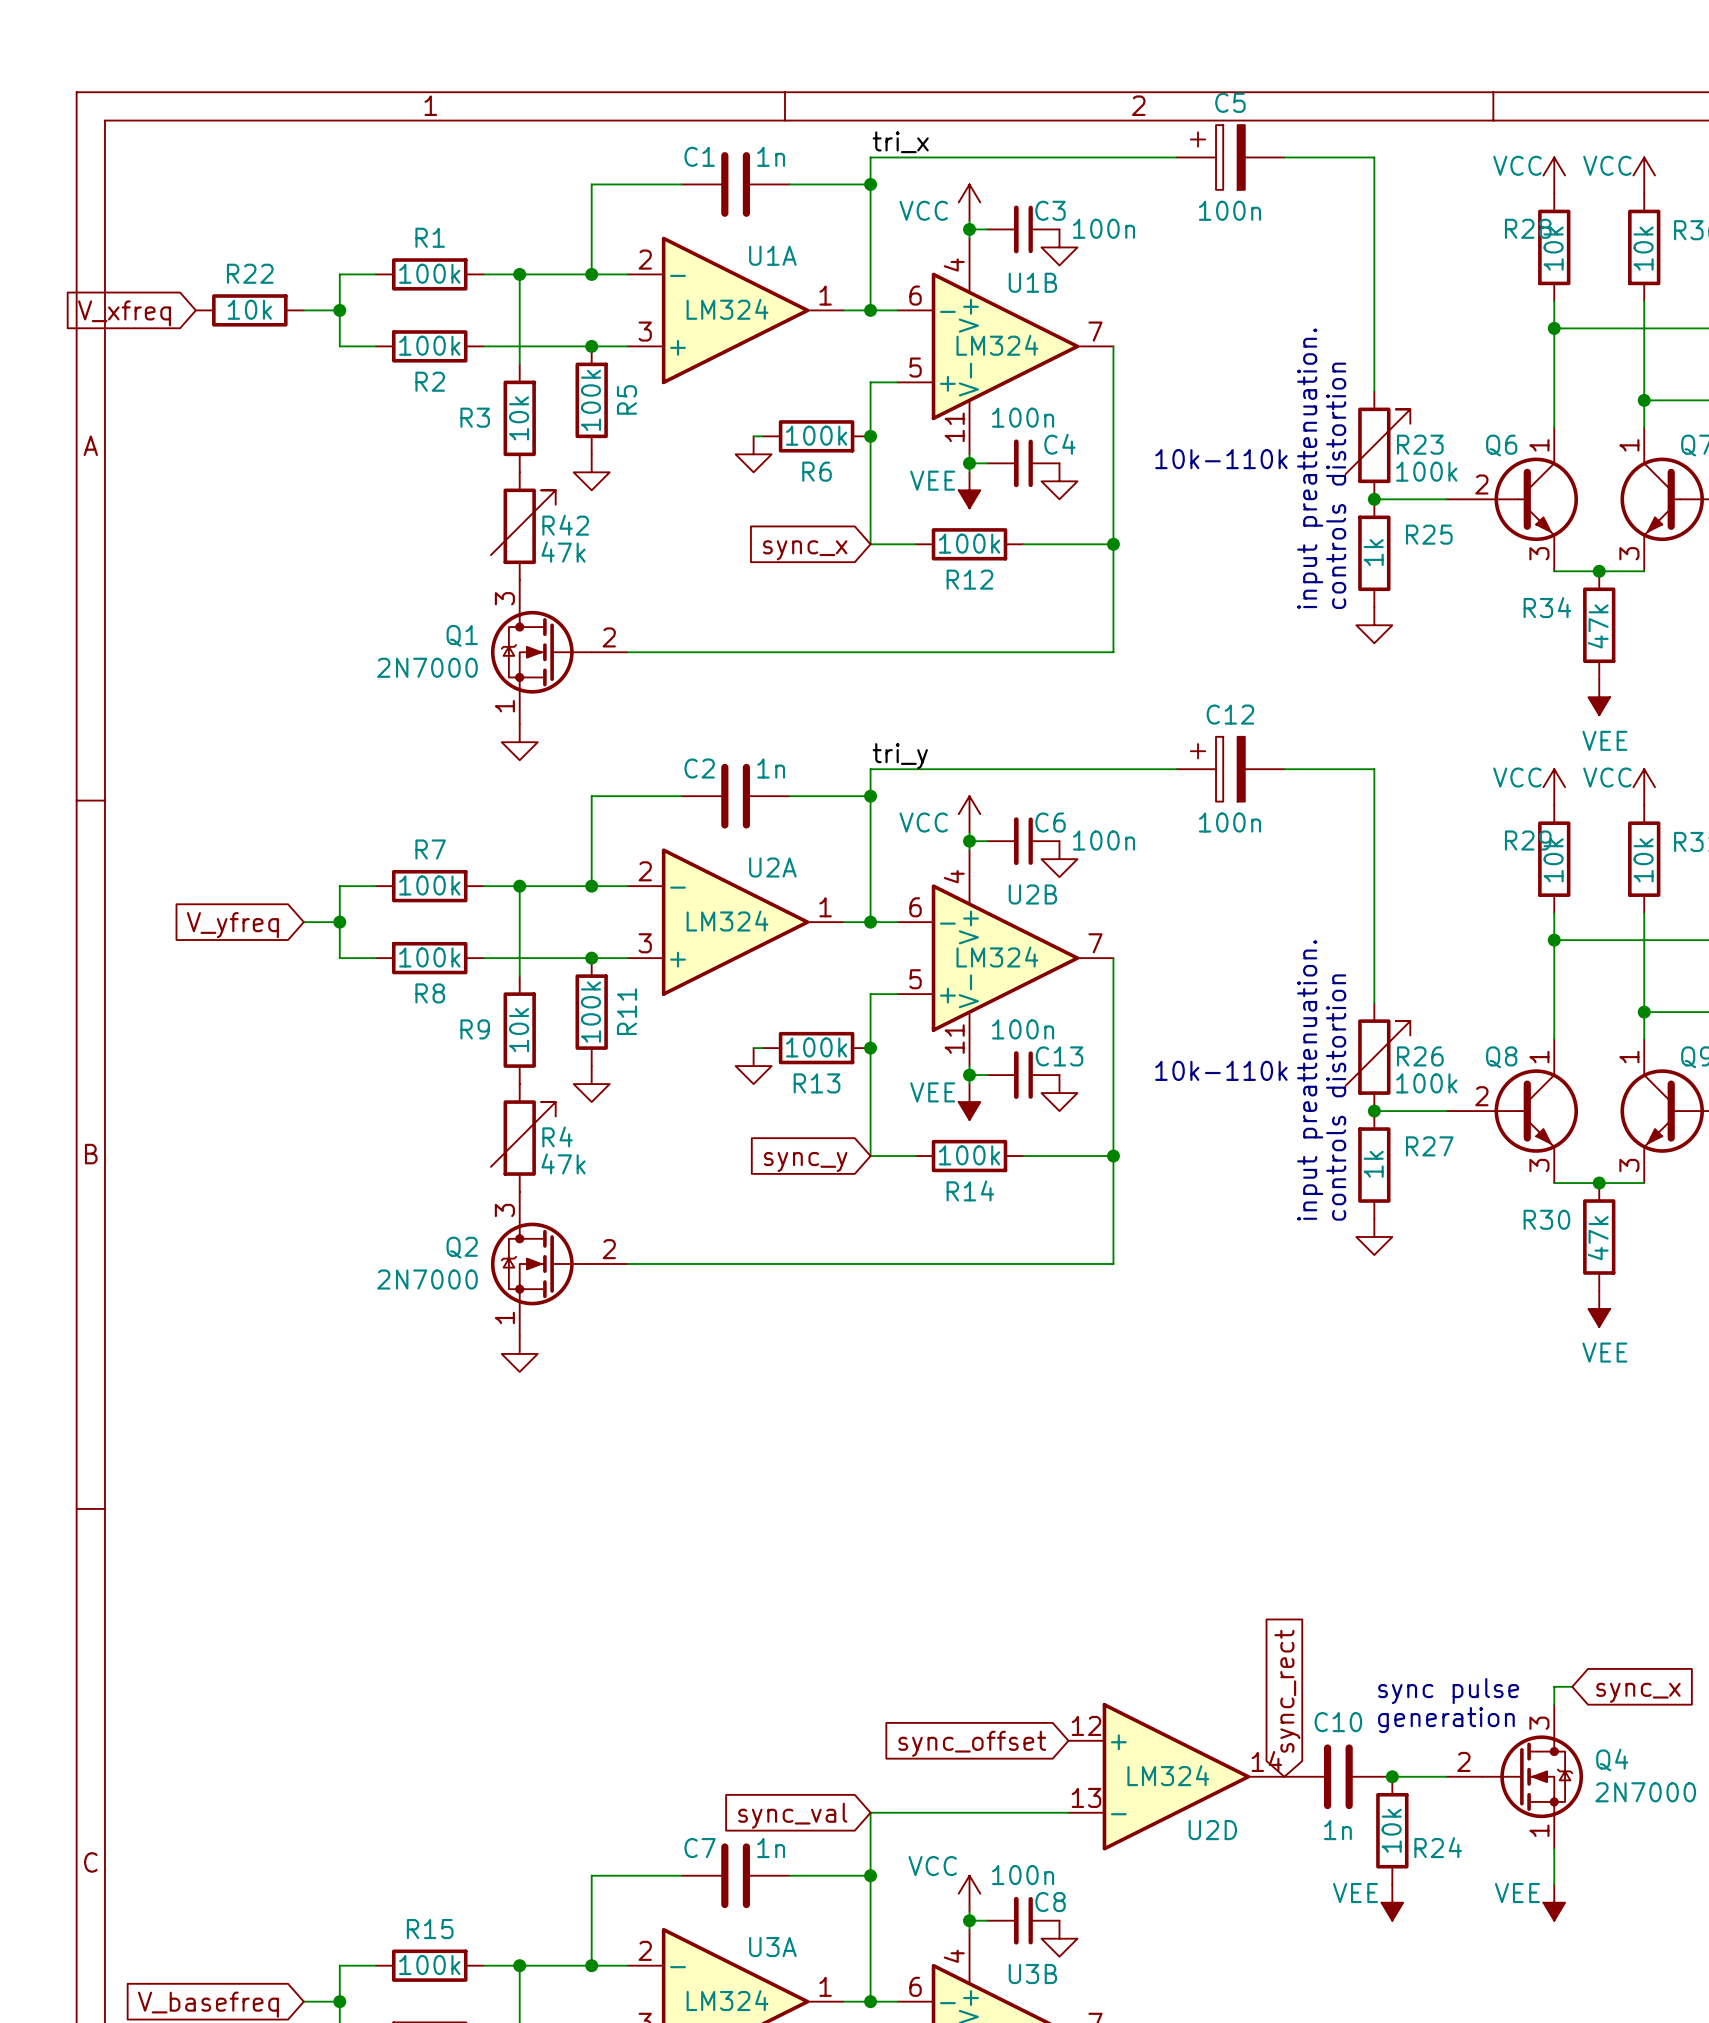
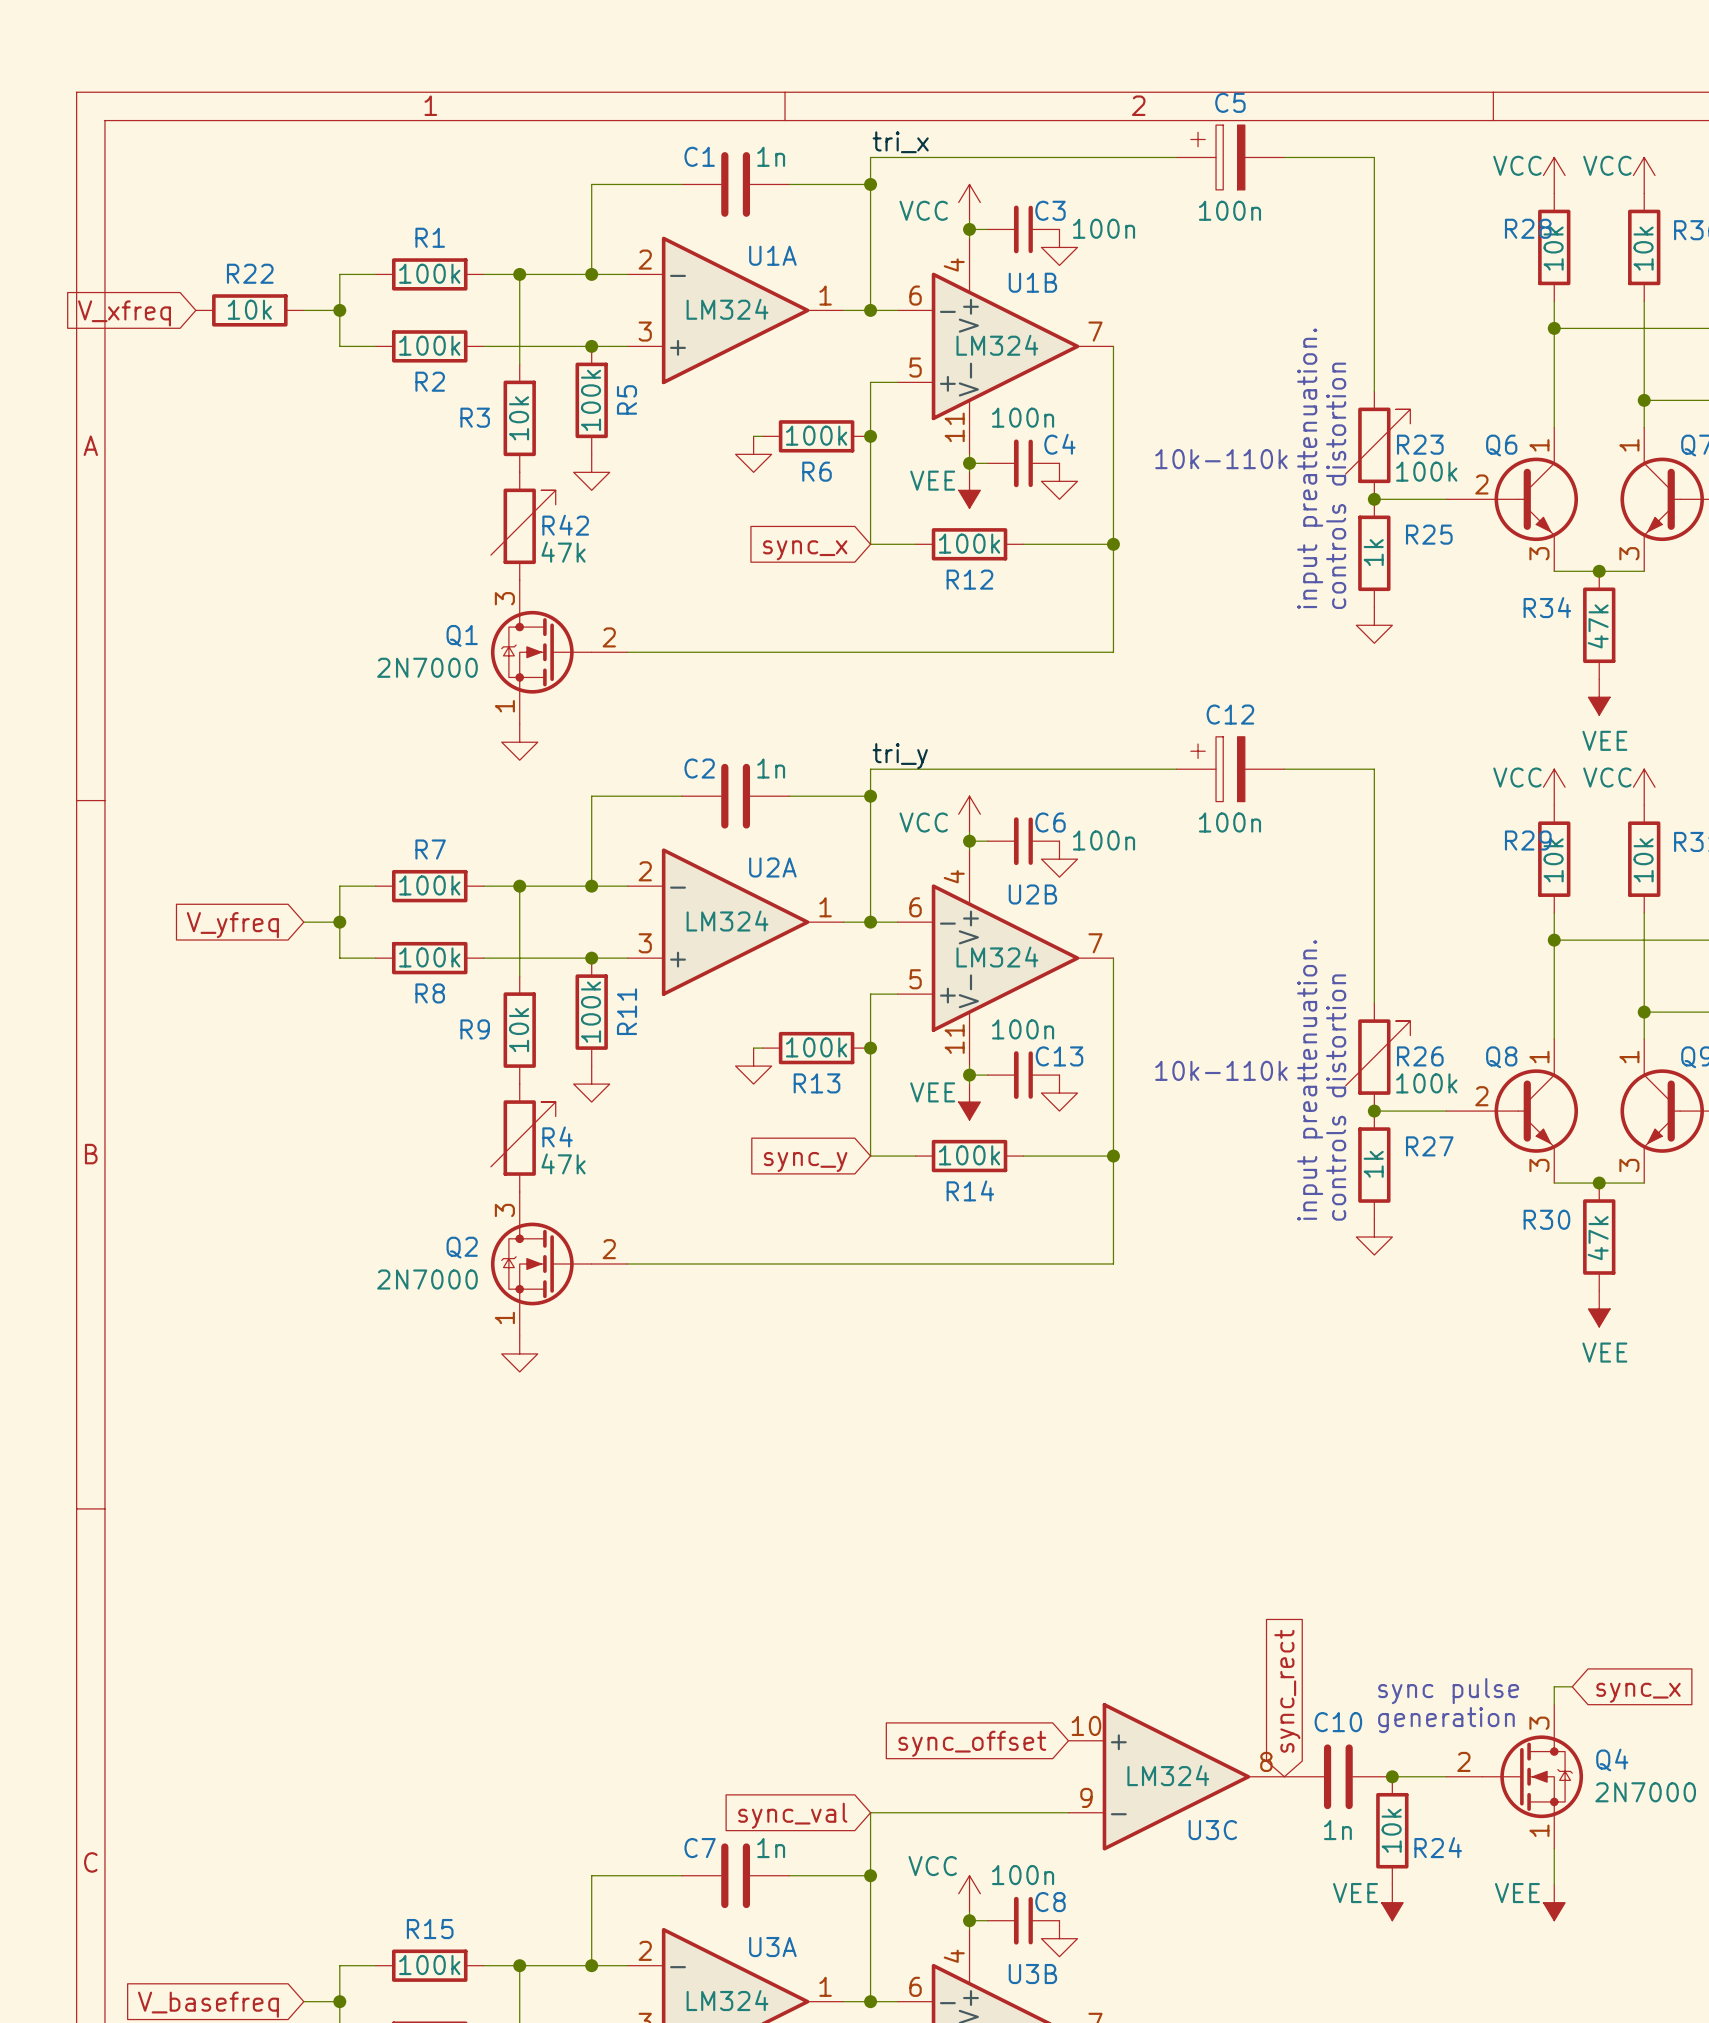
U2D pin number: 12 (1086, 1725) -> 10 (1086, 1725)
U2D pin number: 14 (1266, 1761) -> 8 (1266, 1761)
U2D pin number: 13 (1086, 1797) -> 9 (1086, 1797)
U2D name: U2D (1212, 1830) -> U3C (1212, 1830)

